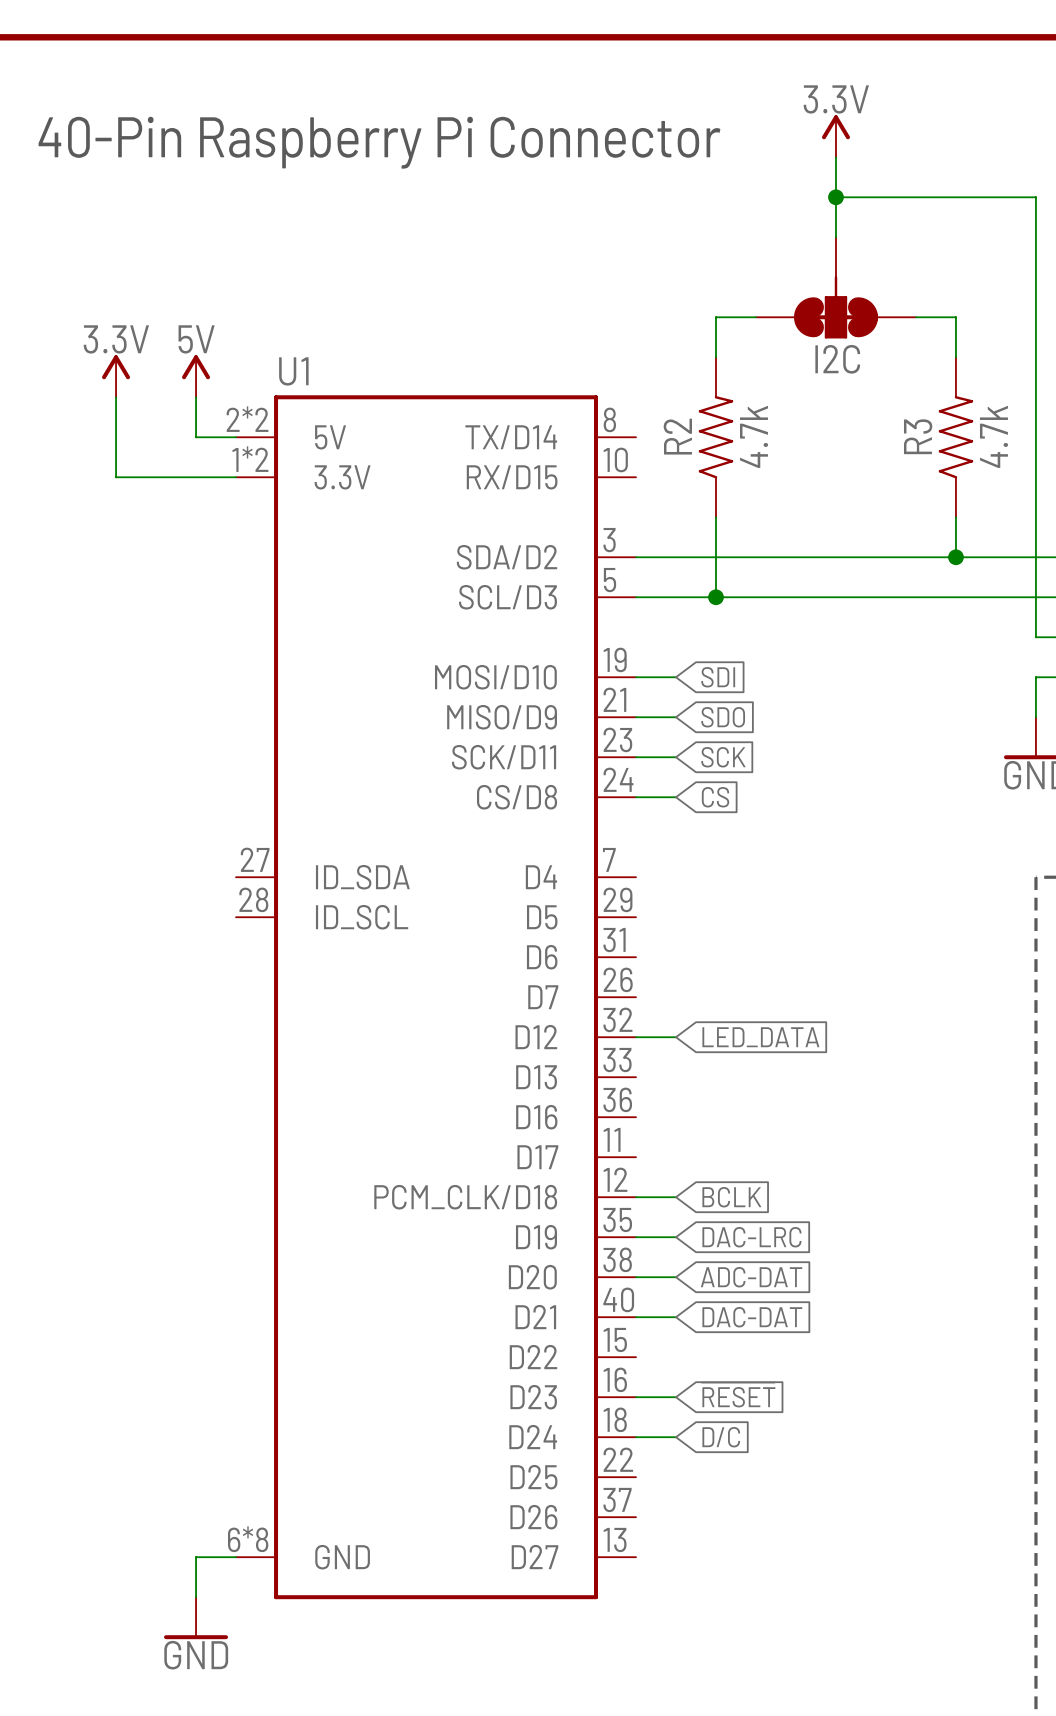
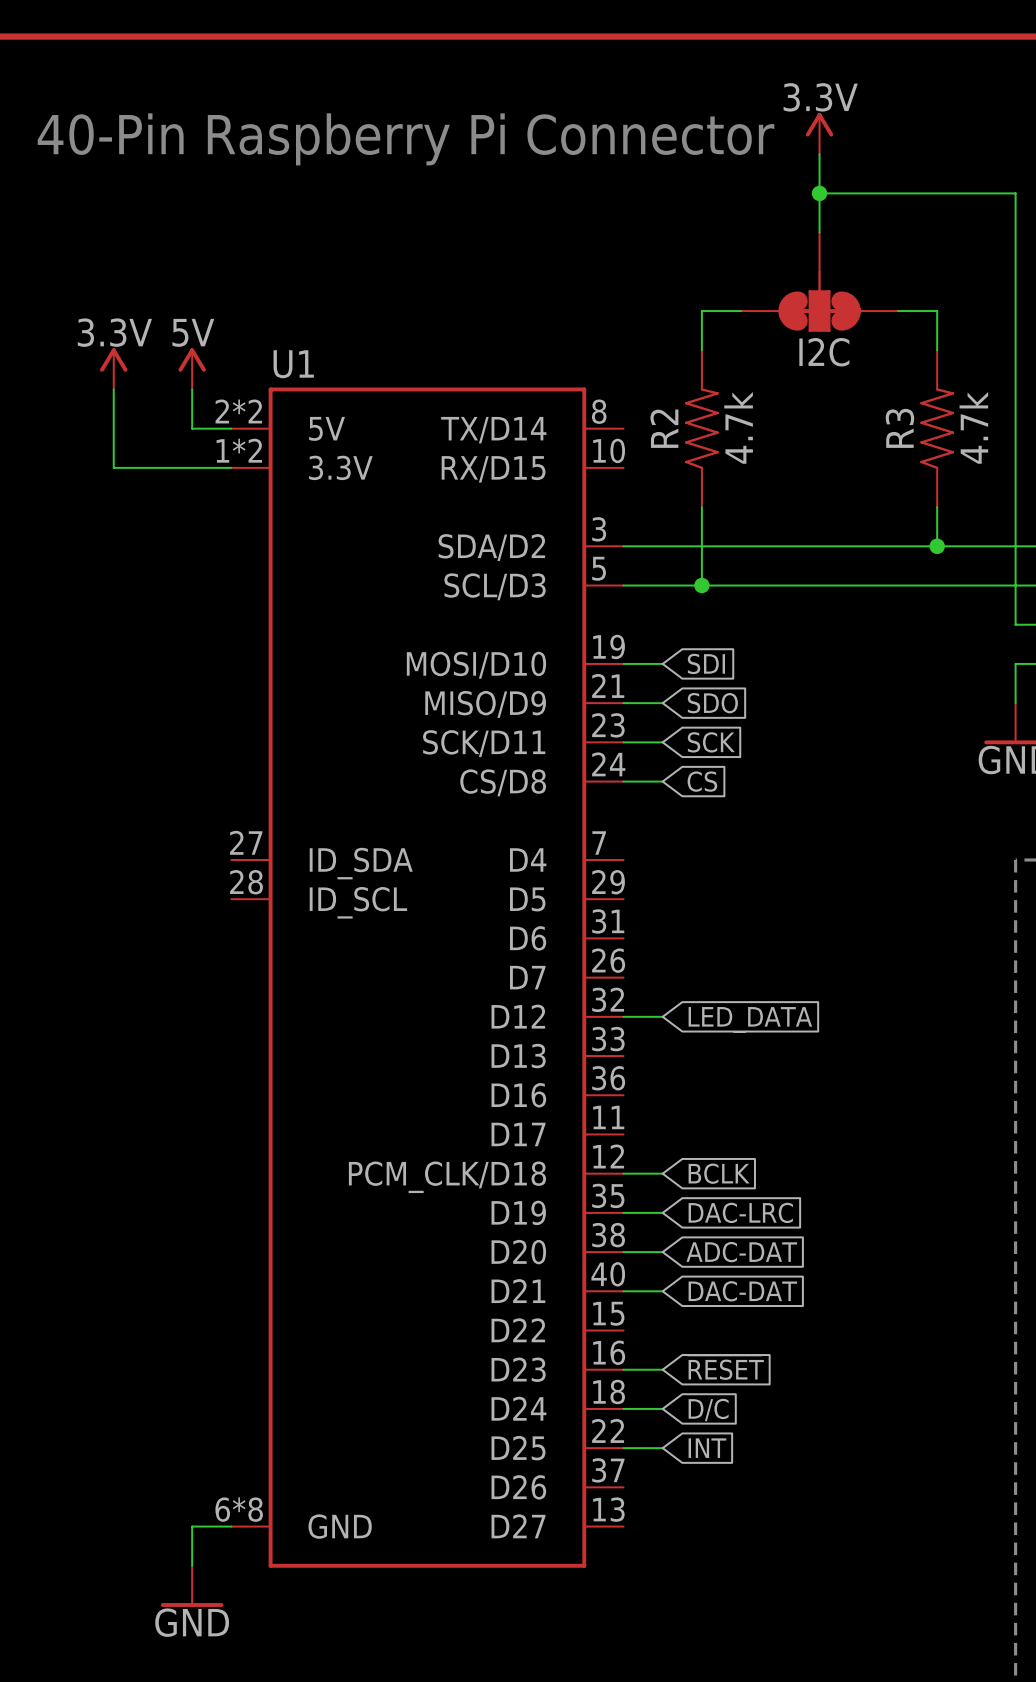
wire: none -> (623, 1448) (662, 1448)
global label: none -> INT (707, 1448)

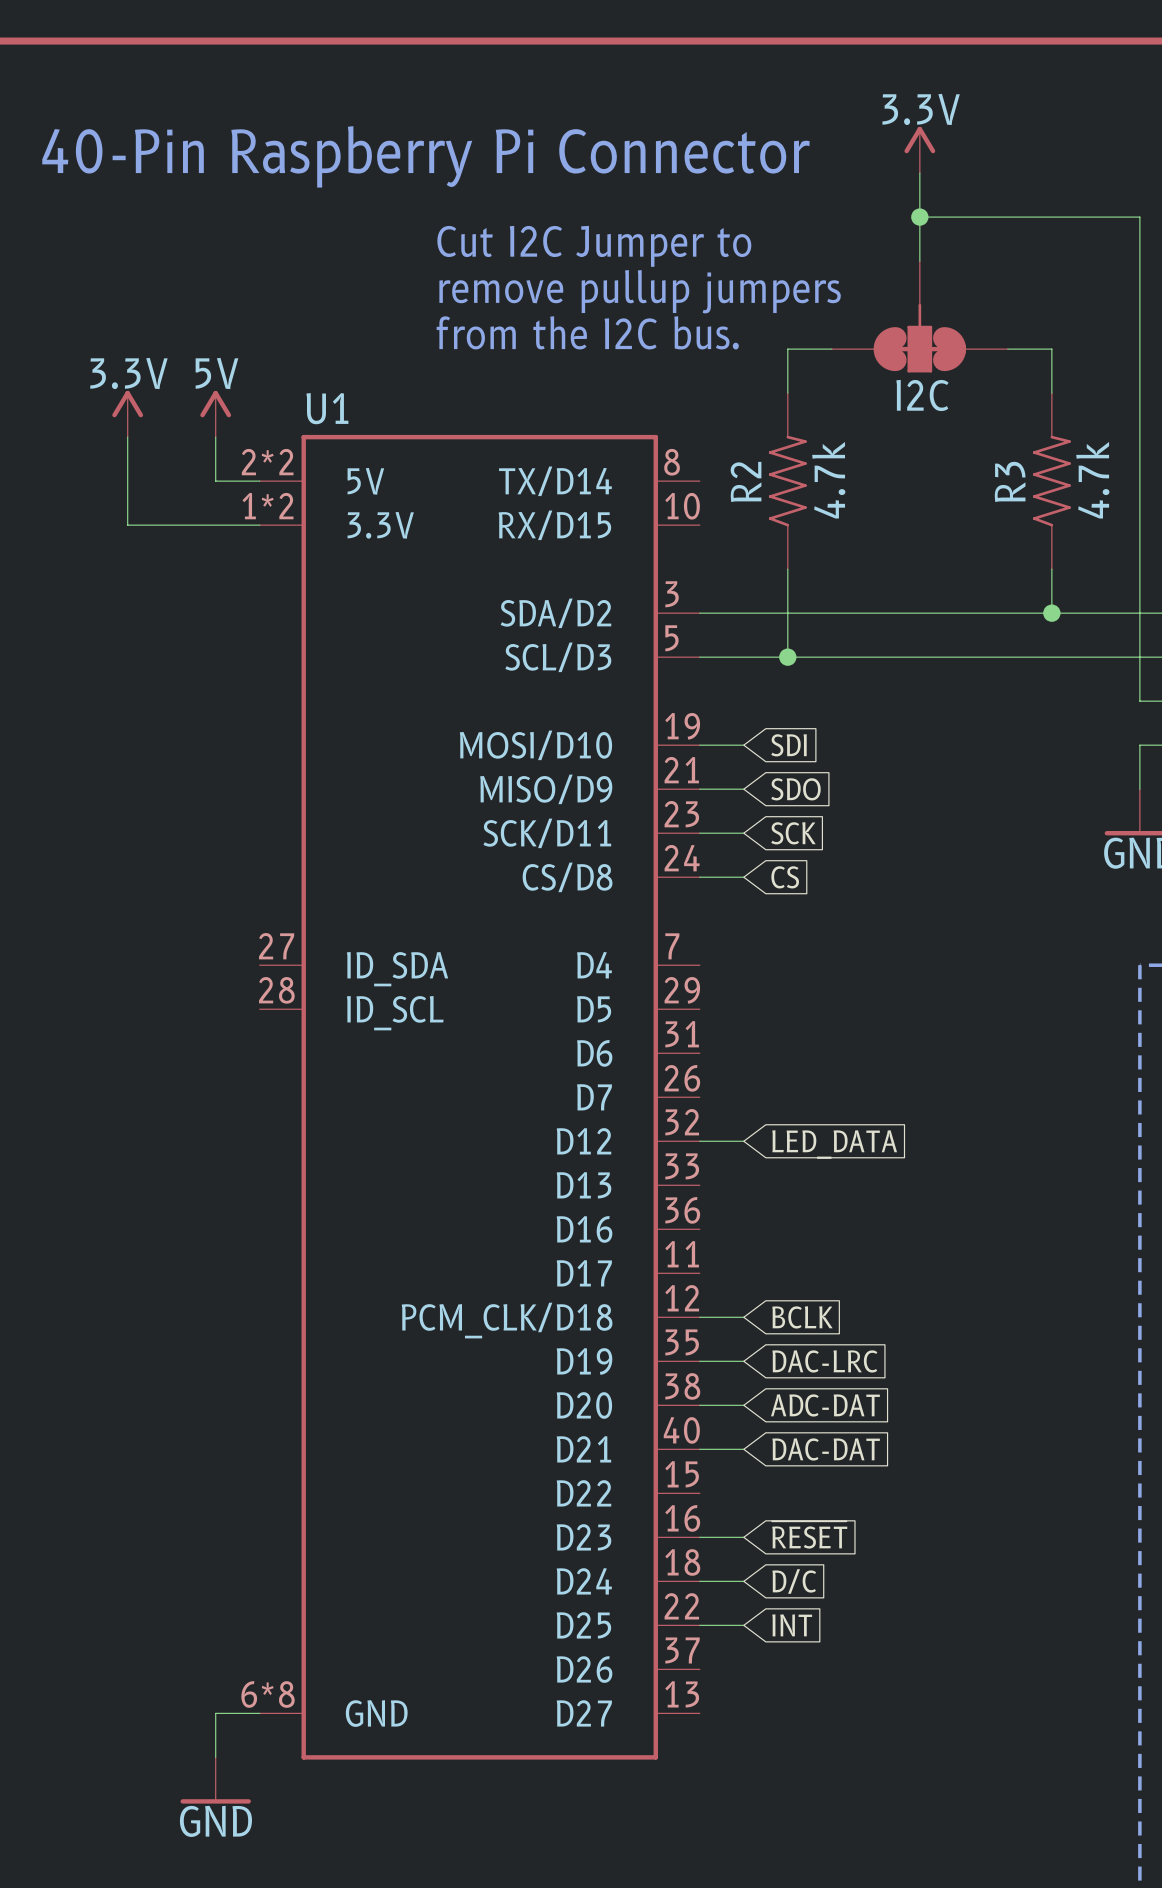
text: none -> Cut I2C Jumper to (594, 246)
text: none -> remove pullup jumpers (640, 291)
text: none -> from the I2C bus. (587, 332)

